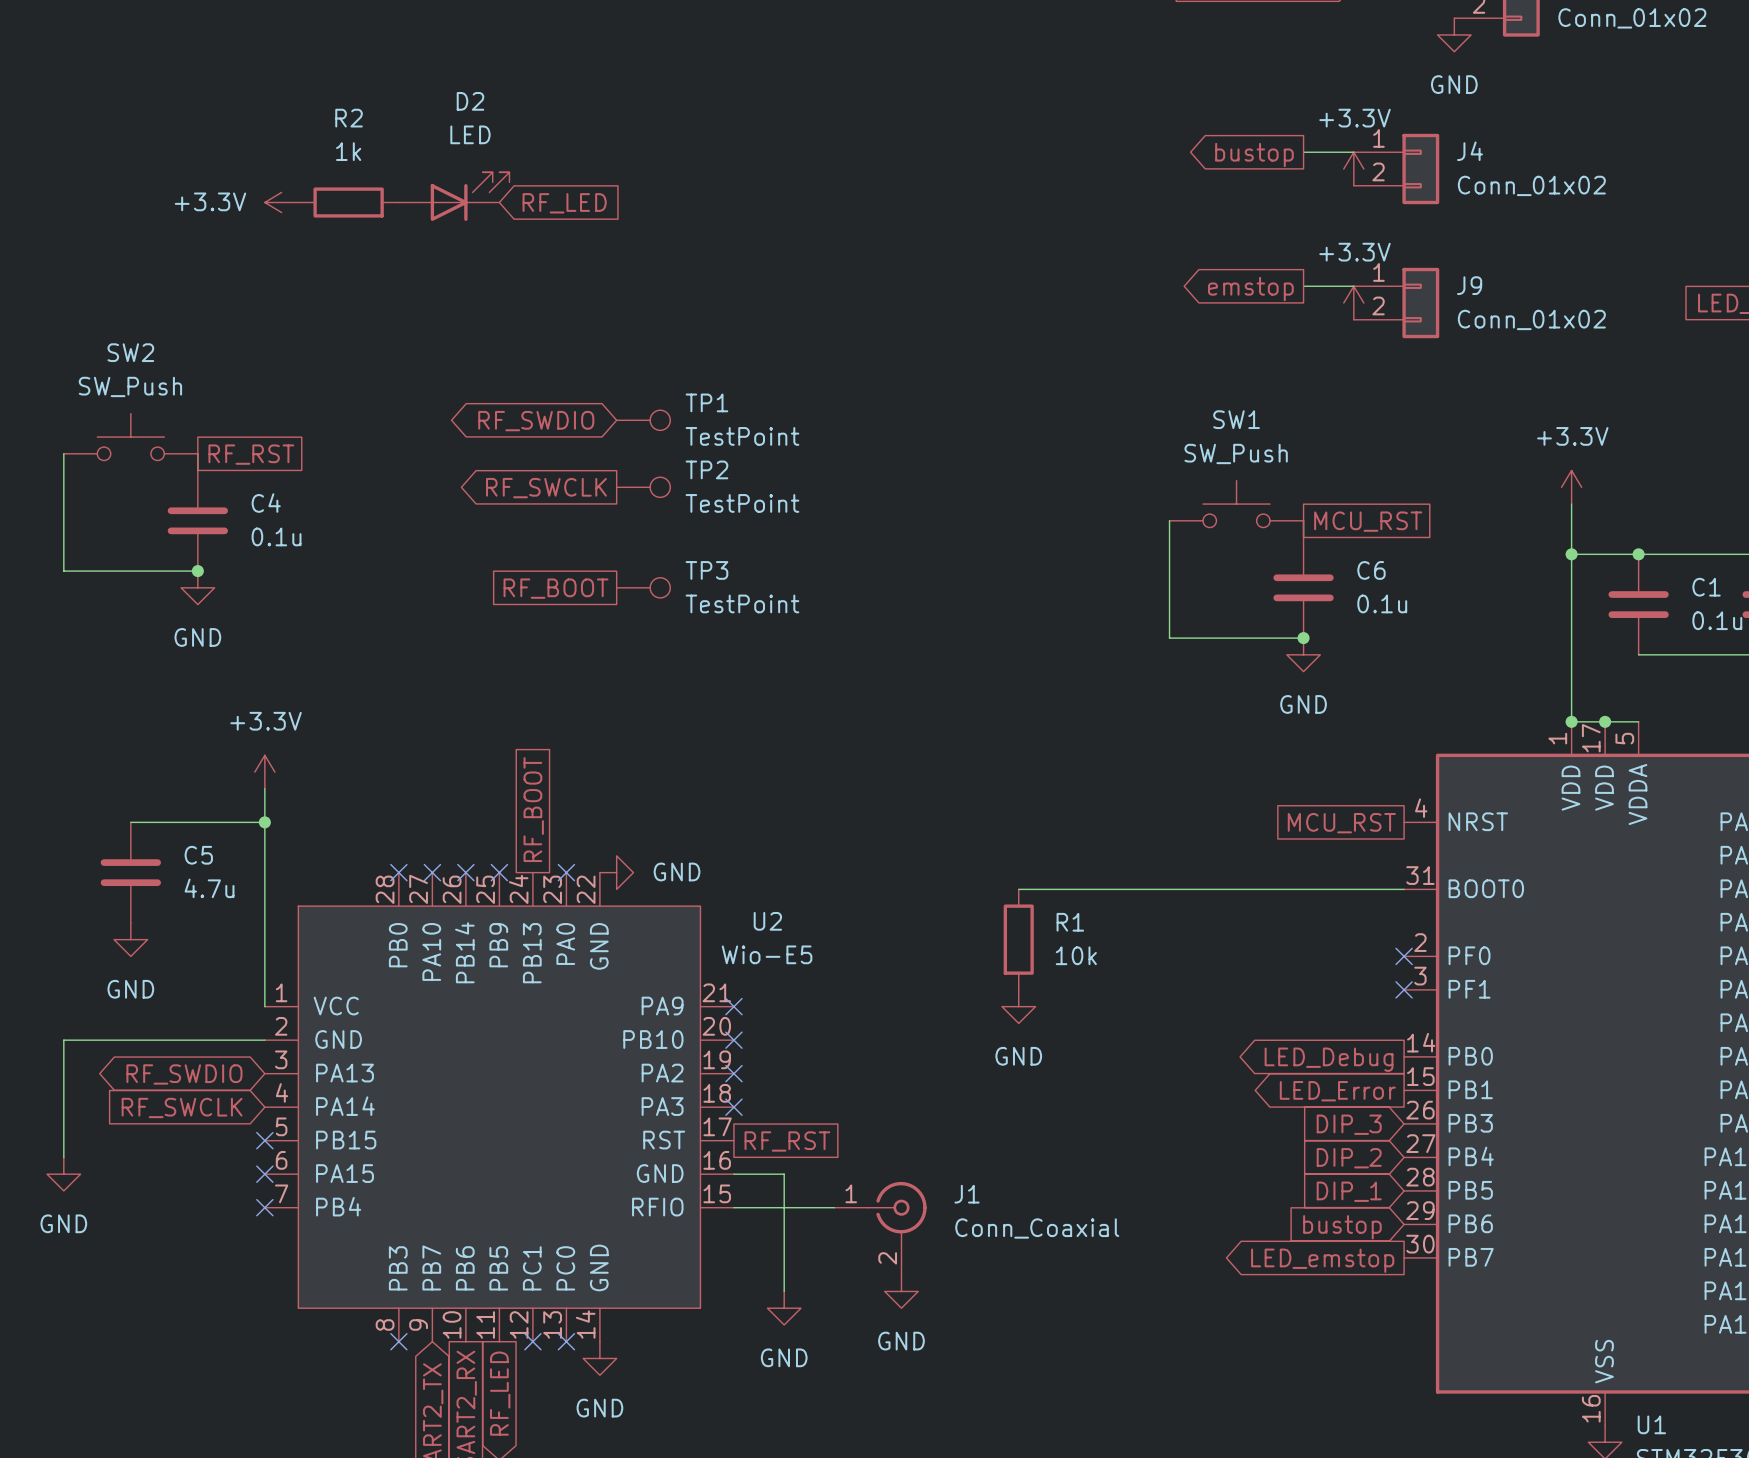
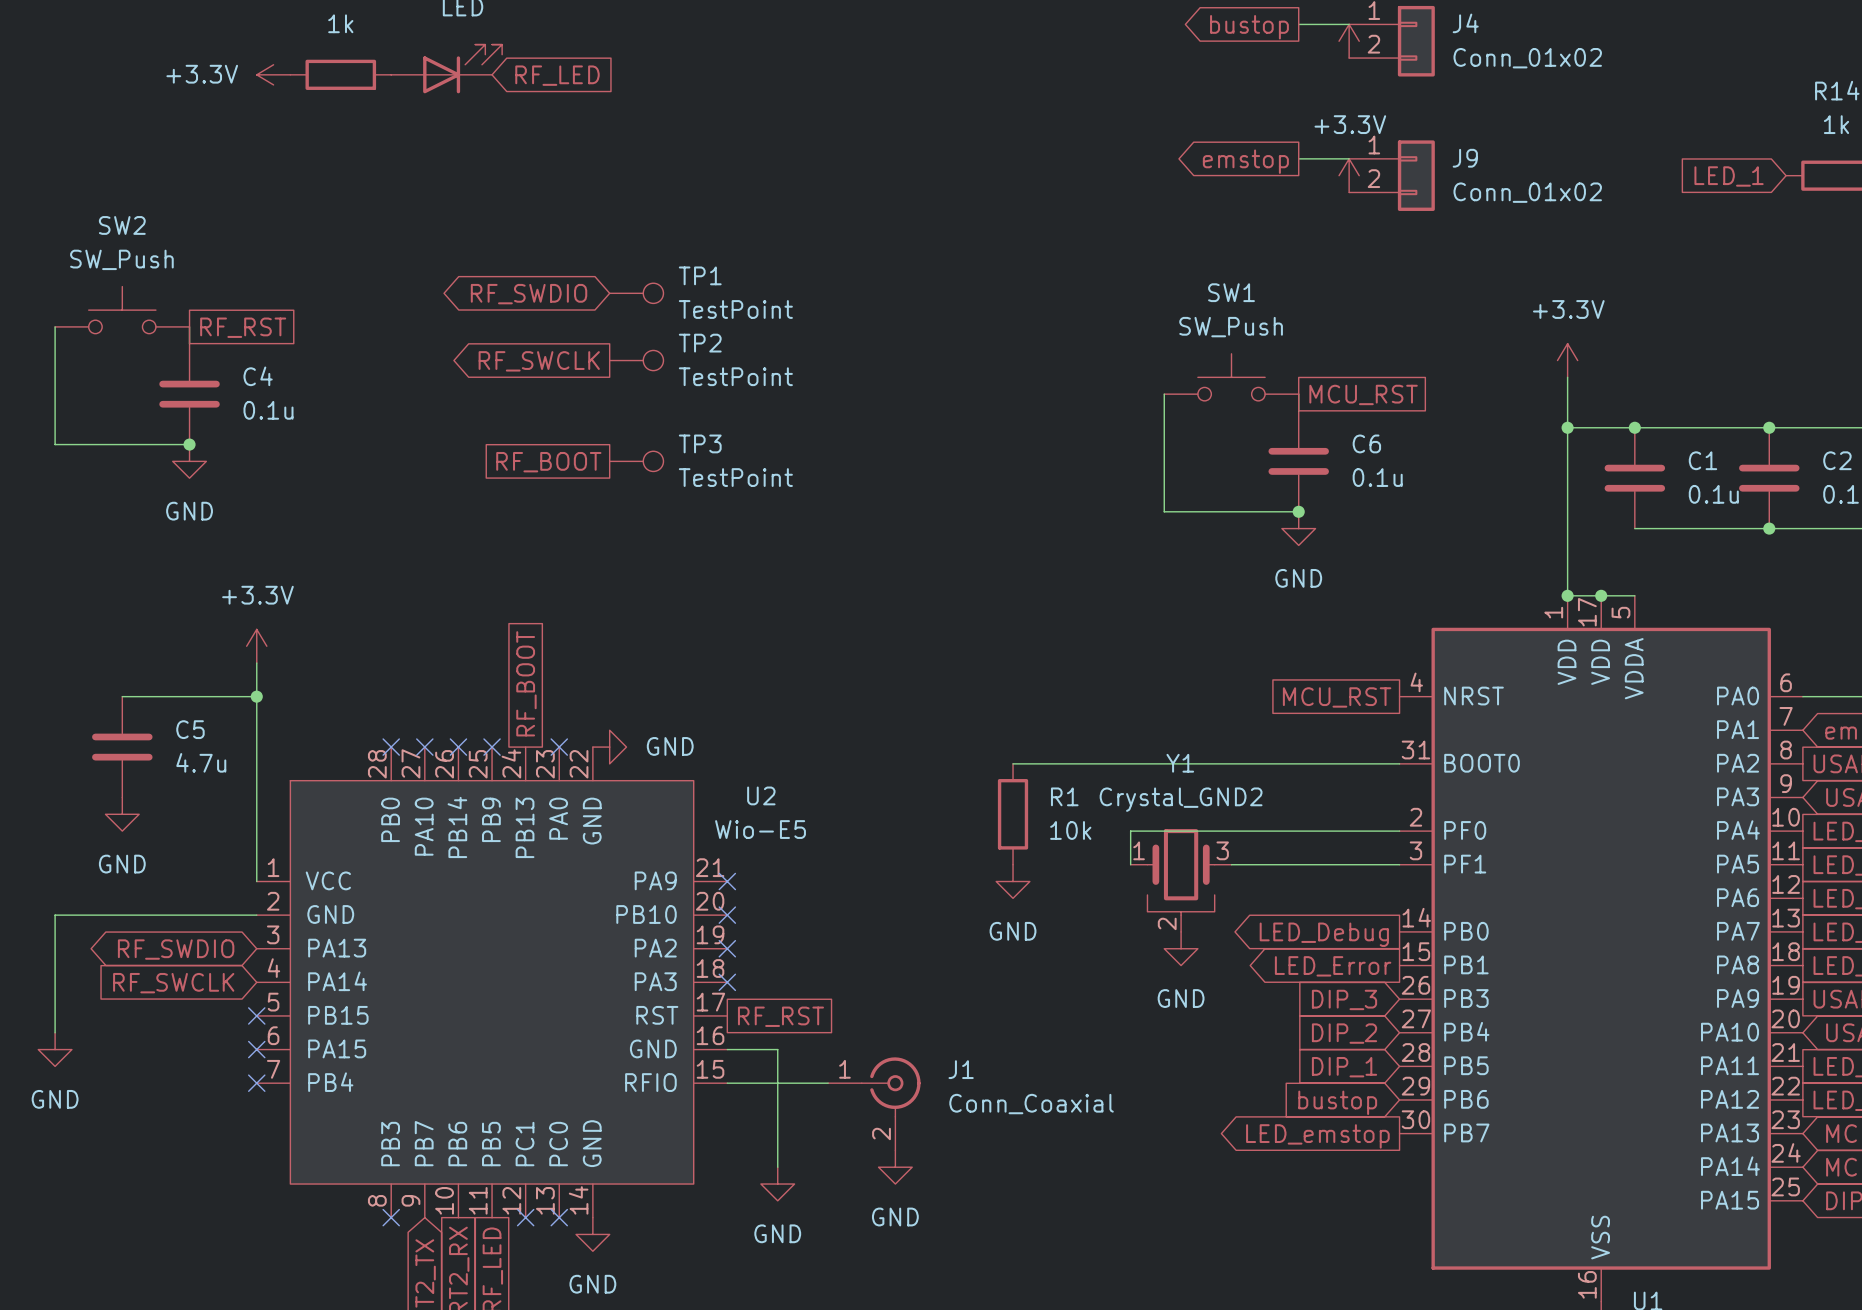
wire: none -> (1399, 831) (1130, 831) (1130, 864)
no-connect mark: (1404, 956) -> none
wire: none -> (1231, 864) (1399, 864)
no-connect mark: (1404, 989) -> none
Y1: none -> Crystal_GND2 (1181, 880)
power symbol: none -> GND (1181, 948)

